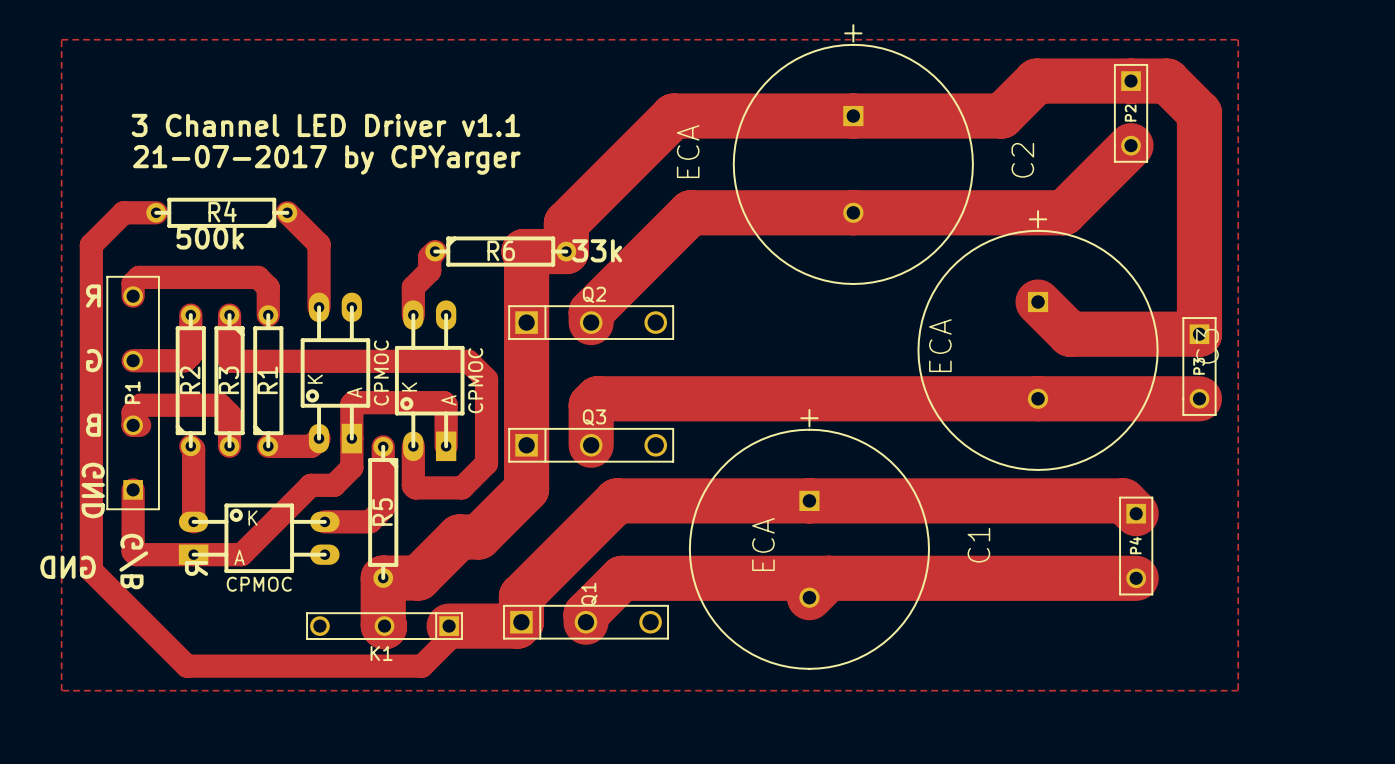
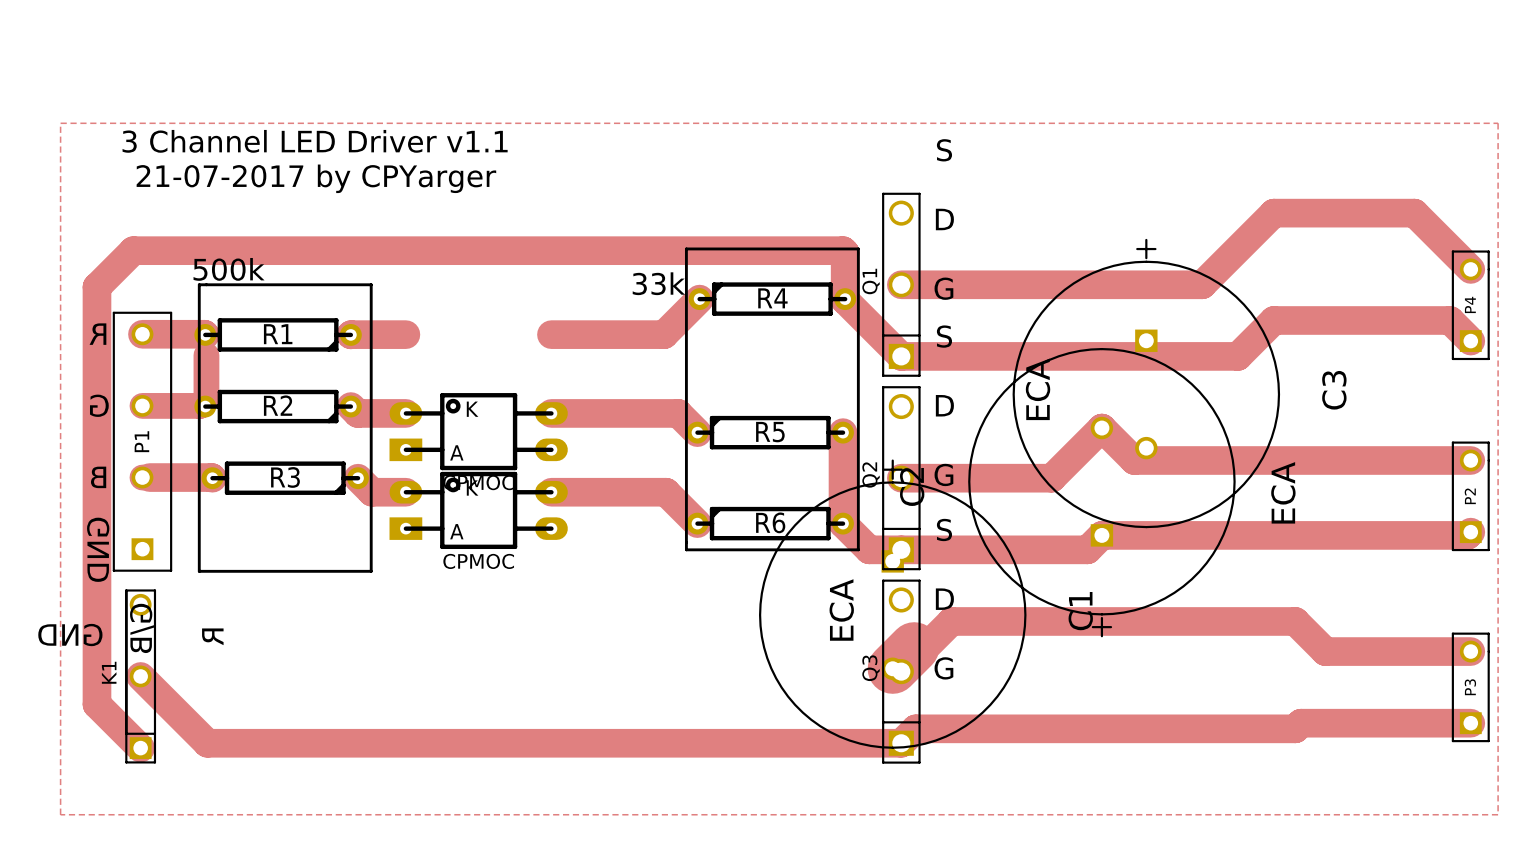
zone outline: (61, 39) (61, 690) (1238, 690) (1238, 39) (61, 39) -> (60, 123) (60, 814) (1498, 814) (1498, 123) (60, 123)
P2 rotation: 0° (1131, 113) -> 180° (1470, 496)
P2 position: (1131, 113) -> (1470, 496)
text position: 3 Channel LED Driver v1.1 (325, 125) -> 3 Channel LED Driver v1.1 (315, 141)
text: none -> S (944, 150)
track: (1131, 145) (1063, 212) (690, 212) (591, 312) (591, 322) -> none
C2 rotation: 0° (853, 154) -> 180° (1101, 492)
C2 position: (853, 154) -> (1101, 492)
text position: 21-07-2017 by CPYarger (326, 159) -> 21-07-2017 by CPYarger (316, 178)
text: none -> D (944, 219)
track: (156, 212) (123, 212) (91, 245) (91, 570) (186, 666) (421, 666) (449, 639) (449, 626) (517, 626) (521, 622) (521, 596) (616, 500) (1123, 500) (1136, 513) -> none
R4 rotation: 0° (221, 212) -> 180° (772, 299)
R4 position: (221, 212) -> (772, 299)
track: (287, 212) (319, 244) (319, 307) -> none
line: none -> (686, 248) (686, 549) (858, 549) (858, 248) (686, 248)
track: none -> (1470, 269) (1414, 213) (1273, 213) (1202, 284) (901, 284)
line: none -> (199, 284) (199, 571) (371, 571) (371, 284) (199, 284)
track: (435, 251) (429, 256) (429, 270) (413, 287) (413, 315) -> none
R6 position: (500, 251) -> (770, 523)
text: none -> G (943, 288)
track: none -> (699, 299) (664, 334) (551, 334)
track: (133, 296) (133, 283) (139, 277) (257, 277) (268, 287) (268, 315) -> (142, 334) (205, 334)
track: none -> (405, 334) (350, 334)
text: none -> S (944, 336)
track: (1038, 302) (1070, 334) (1199, 334) (1199, 113) (1167, 81) (1036, 81) (1001, 116) (673, 116) (566, 223) (566, 251) (524, 251) (526, 254) (526, 489) (478, 536) (459, 536) (418, 578) (383, 578) -> none
track: none -> (1470, 341) (1450, 320) (1273, 320) (1237, 356) (901, 356) (845, 300) (845, 252) (843, 250) (133, 250) (96, 287) (96, 704) (140, 748)
track: (229, 315) (230, 361) (468, 361) (486, 379) (486, 463) (462, 487) (415, 487) (413, 485) (413, 446) -> none
Q2 rotation: 0° (591, 322) -> 90° counterclockwise (901, 478)
Q2 position: (591, 322) -> (901, 478)
text: none -> D (944, 405)
track: none -> (350, 406) (357, 413) (405, 413)
P3 rotation: 0° (1199, 366) -> 180° (1470, 687)
P3 position: (1199, 366) -> (1470, 687)
track: none -> (551, 413) (678, 413) (697, 432)
part: CPMOC (335, 372) -> none
R2 rotation: 0° (190, 380) -> 90° counterclockwise (278, 406)
R3 rotation: 0° (229, 380) -> 90° clockwise (285, 478)
R1 rotation: 0° (268, 380) -> 90° counterclockwise (278, 334)
part rotation: 0° (429, 380) -> 90° clockwise (478, 431)
track: none -> (843, 432) (843, 523) (869, 549) (1087, 549) (1101, 535) (1467, 535) (1470, 532)
track: (1199, 398) (597, 398) (591, 405) (591, 445) -> none
track: none -> (1470, 460) (1134, 460) (1101, 428) (1051, 478) (901, 478)
text: none -> G (943, 474)
track: (133, 425) (133, 412) (140, 405) (220, 405) (229, 414) (229, 446) -> none
track: none -> (149, 477) (212, 478)
track: none -> (358, 478) (372, 492) (405, 492)
track: (319, 438) (311, 446) (268, 446) -> none
track: none -> (551, 492) (666, 492) (697, 523)
Q3 rotation: 0° (591, 445) -> 90° counterclockwise (901, 671)
Q3 position: (591, 445) -> (901, 671)
track: (190, 446) (193, 449) (193, 521) -> none
track: (383, 446) (383, 508) (369, 521) (324, 521) -> none
track: (446, 446) (446, 404) (443, 402) (353, 402) (351, 404) (351, 467) (334, 485) (310, 485) (241, 554) (136, 554) (133, 551) (133, 489) -> none
part: none -> CPMOC (478, 510)
text: none -> S (944, 529)
R5 rotation: 0° (383, 512) -> 90° counterclockwise (770, 432)
R5 position: (383, 512) -> (770, 432)
text: none -> D (944, 599)
part: CPMOC (259, 538) -> none
P4 rotation: 0° (1136, 546) -> 180° (1470, 305)
P4 position: (1136, 546) -> (1470, 305)
track: (383, 578) (384, 626) -> none
track: (1136, 578) (622, 578) (586, 614) (586, 622) -> none
track: none -> (1470, 651) (1325, 651) (1295, 621) (951, 621) (901, 671)
text: none -> G (943, 668)
track: none -> (140, 676) (207, 743) (901, 743) (915, 728) (1295, 728) (1300, 723) (1470, 723)
Q1 rotation: 0° (586, 622) -> 90° counterclockwise (901, 284)
Q1 position: (586, 622) -> (901, 284)
K1 rotation: 0° (384, 626) -> 90° clockwise (140, 676)
K1 position: (384, 626) -> (140, 676)

